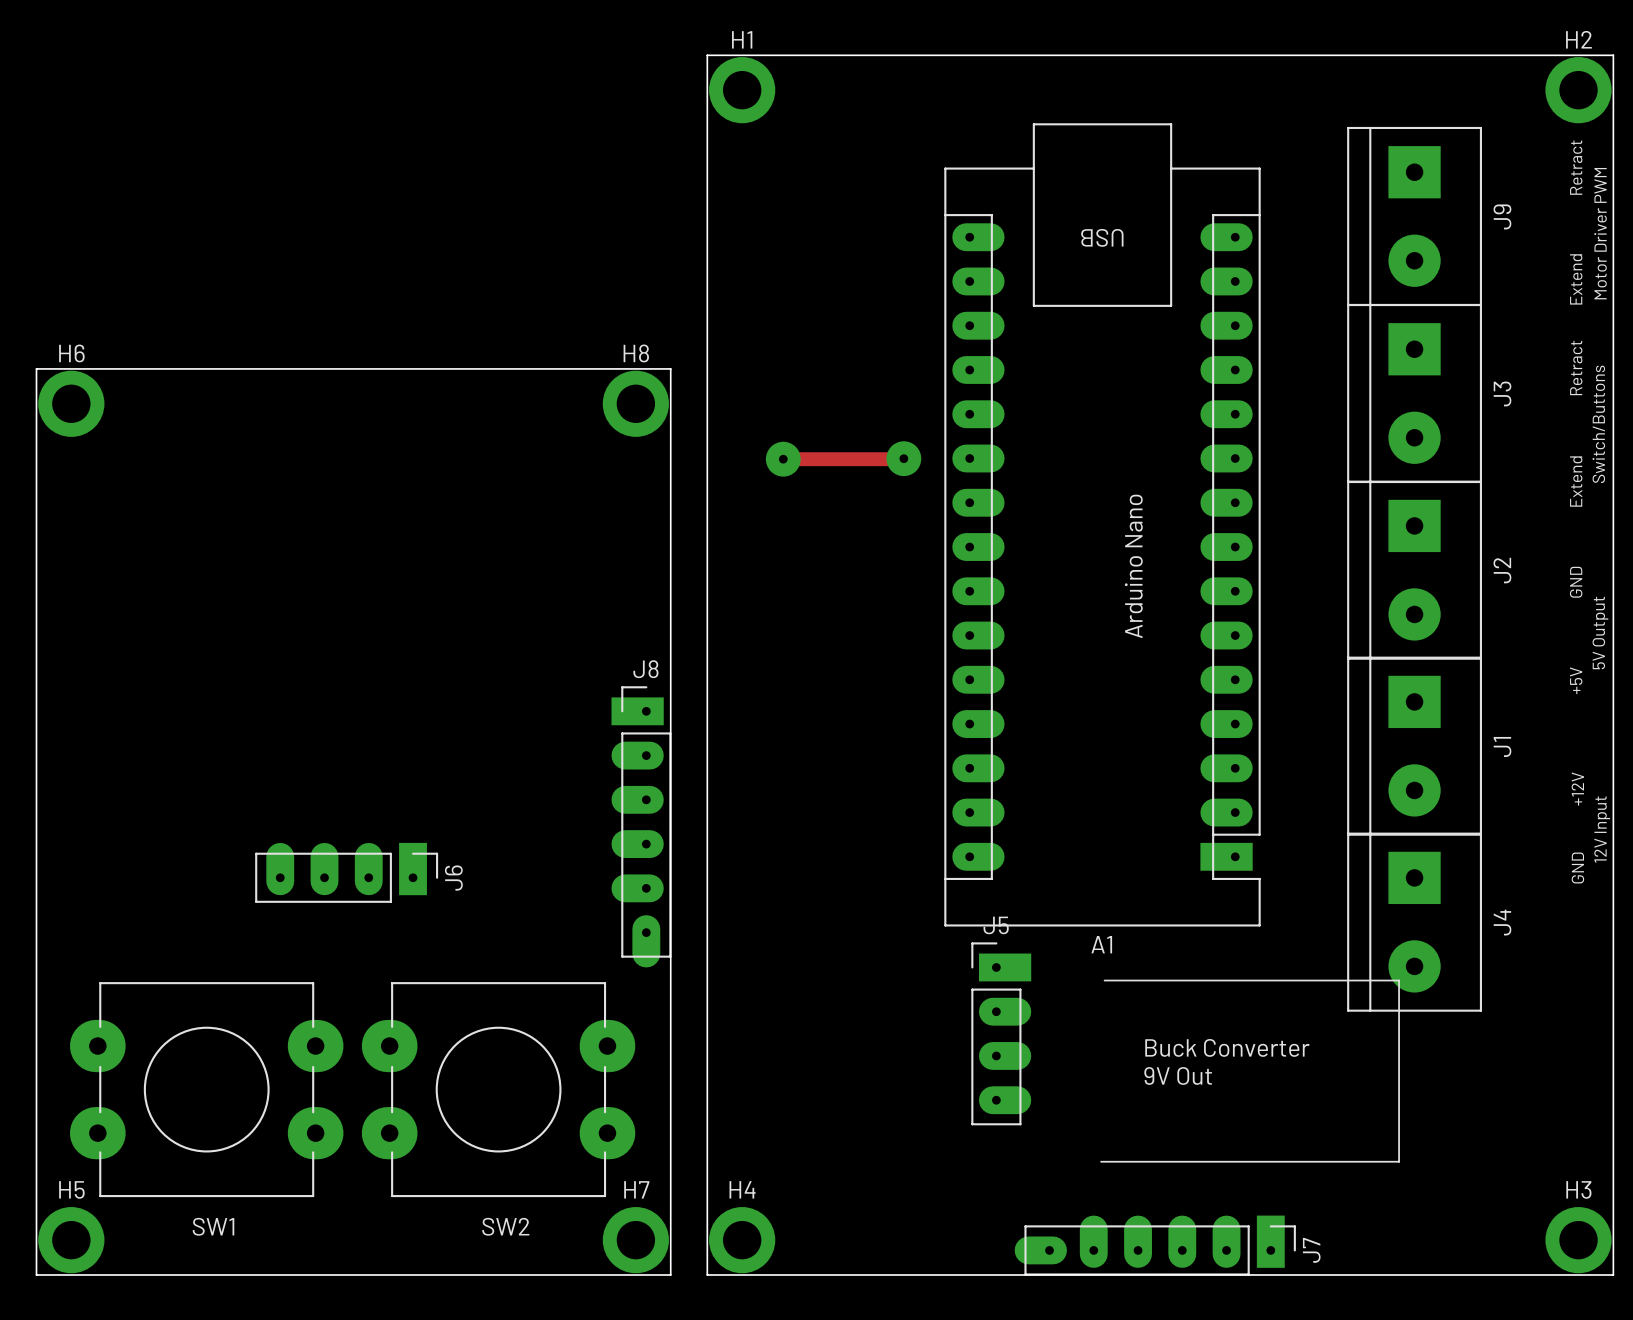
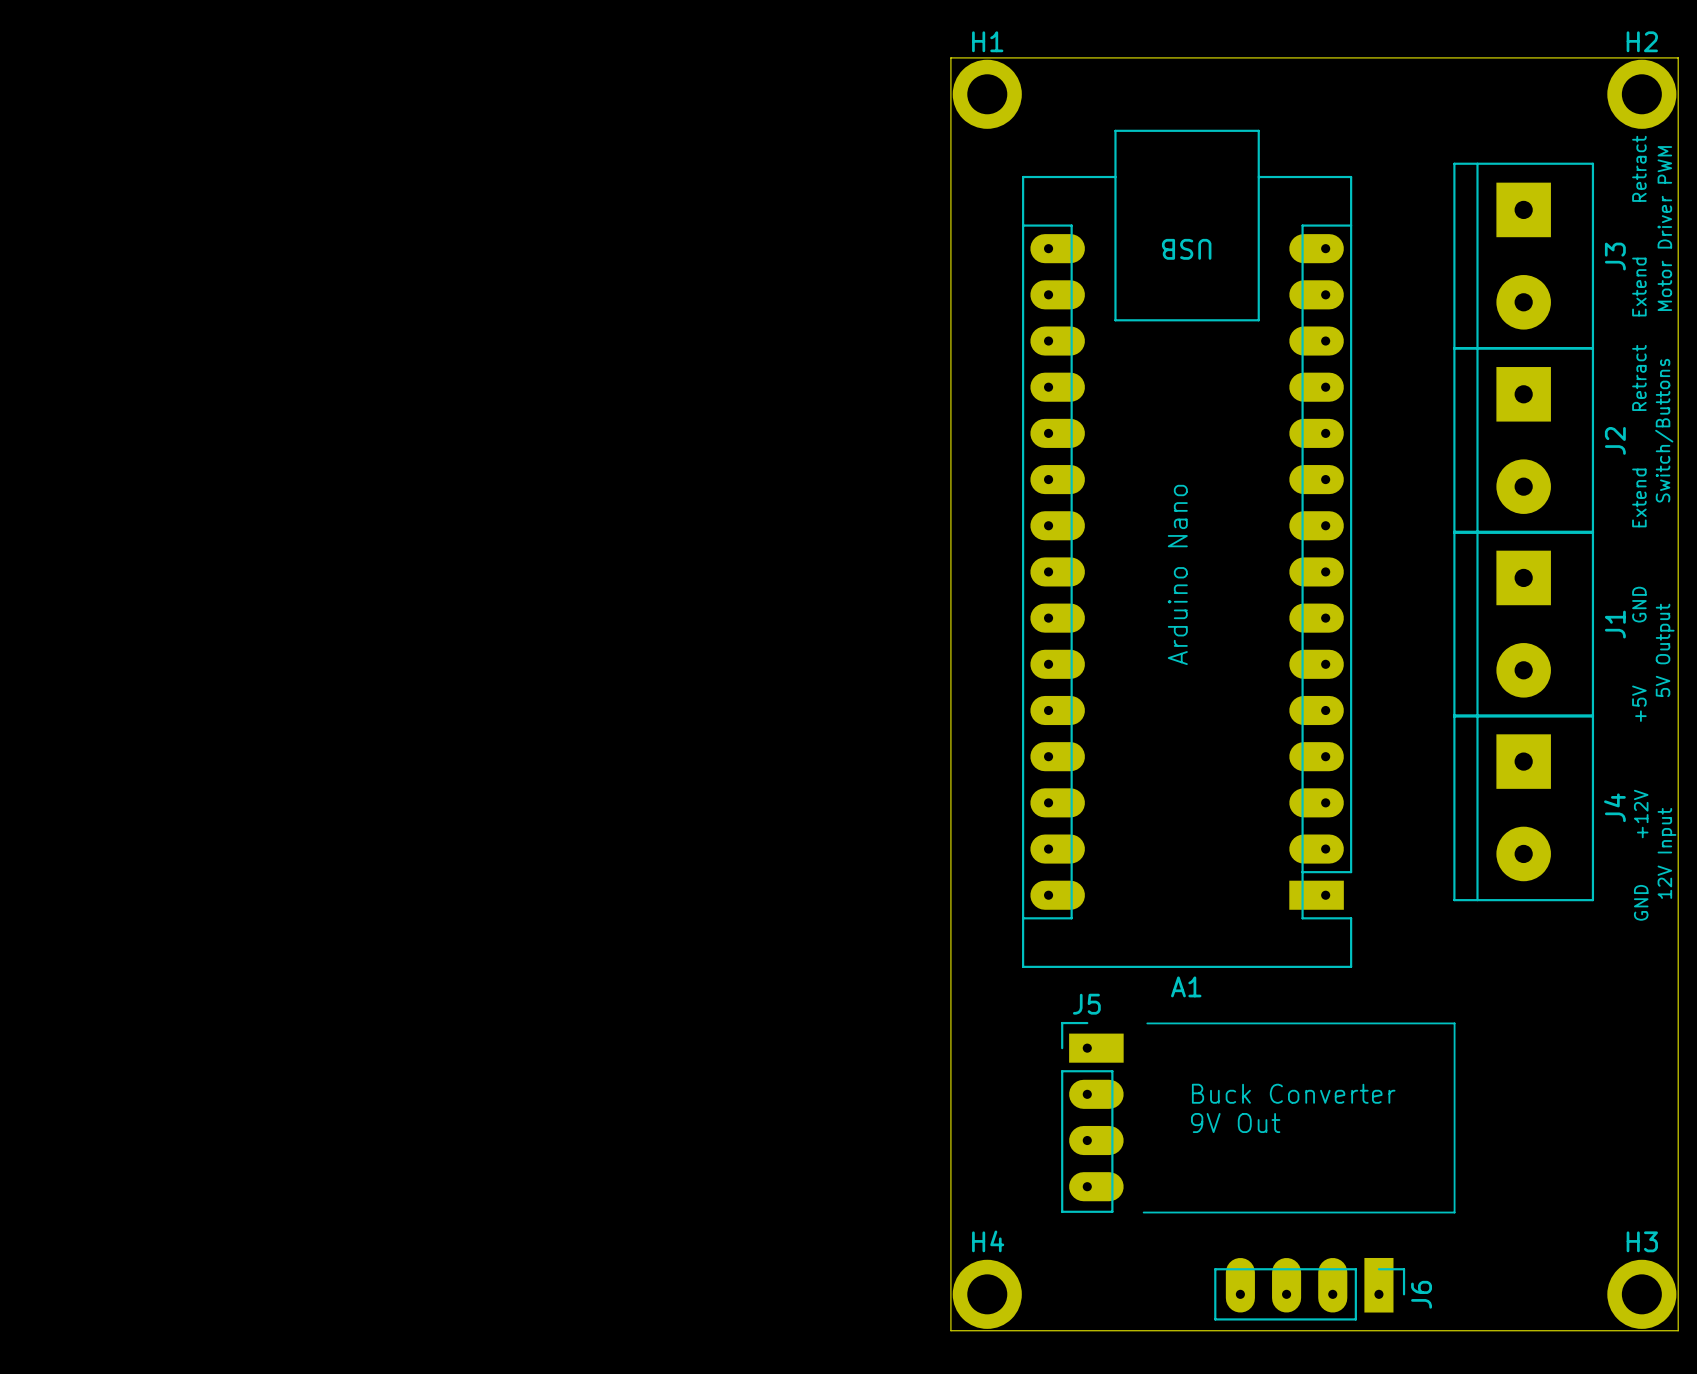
board edge: (916, 55) (707, 55) (707, 1274) (916, 1274) -> (950, 57) (950, 1330)
H1 position: (742, 90) -> (987, 94)
J9: (1414, 216) -> none
board edge: (36, 368) (670, 368) (670, 1274) (36, 1274) (36, 368) -> none
J3 position: (1414, 393) -> (1523, 256)
H6: (71, 403) -> none
H8: (635, 403) -> none
track: (903, 458) (783, 459) -> none
via: (903, 458) -> none
via: (783, 459) -> none
A1 position: (1102, 524) -> (1187, 548)
J2 position: (1414, 570) -> (1523, 440)
J1 position: (1414, 746) -> (1523, 624)
J8: (641, 826) -> none
J6 position: (346, 872) -> (1309, 1289)
J4 position: (1414, 922) -> (1523, 807)
J5 position: (1001, 1033) -> (1092, 1117)
SW1: (206, 1089) -> none
SW2: (498, 1089) -> none
H5: (71, 1240) -> none
H7: (635, 1240) -> none
H4 position: (742, 1240) -> (987, 1294)
J7: (1155, 1245) -> none

